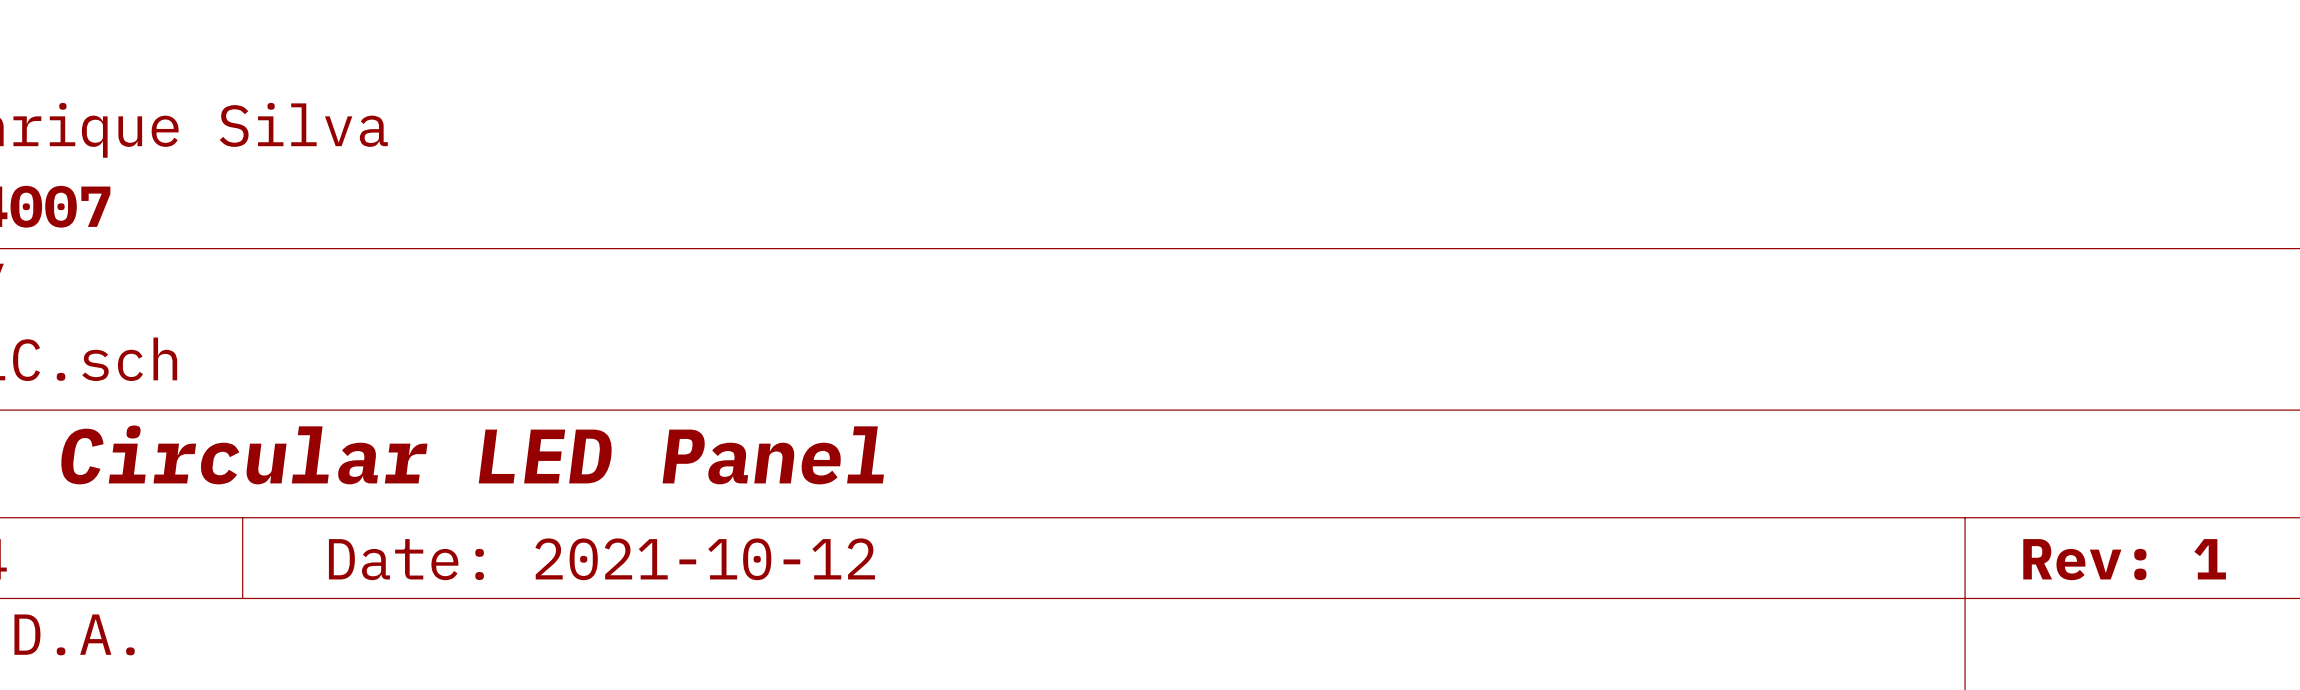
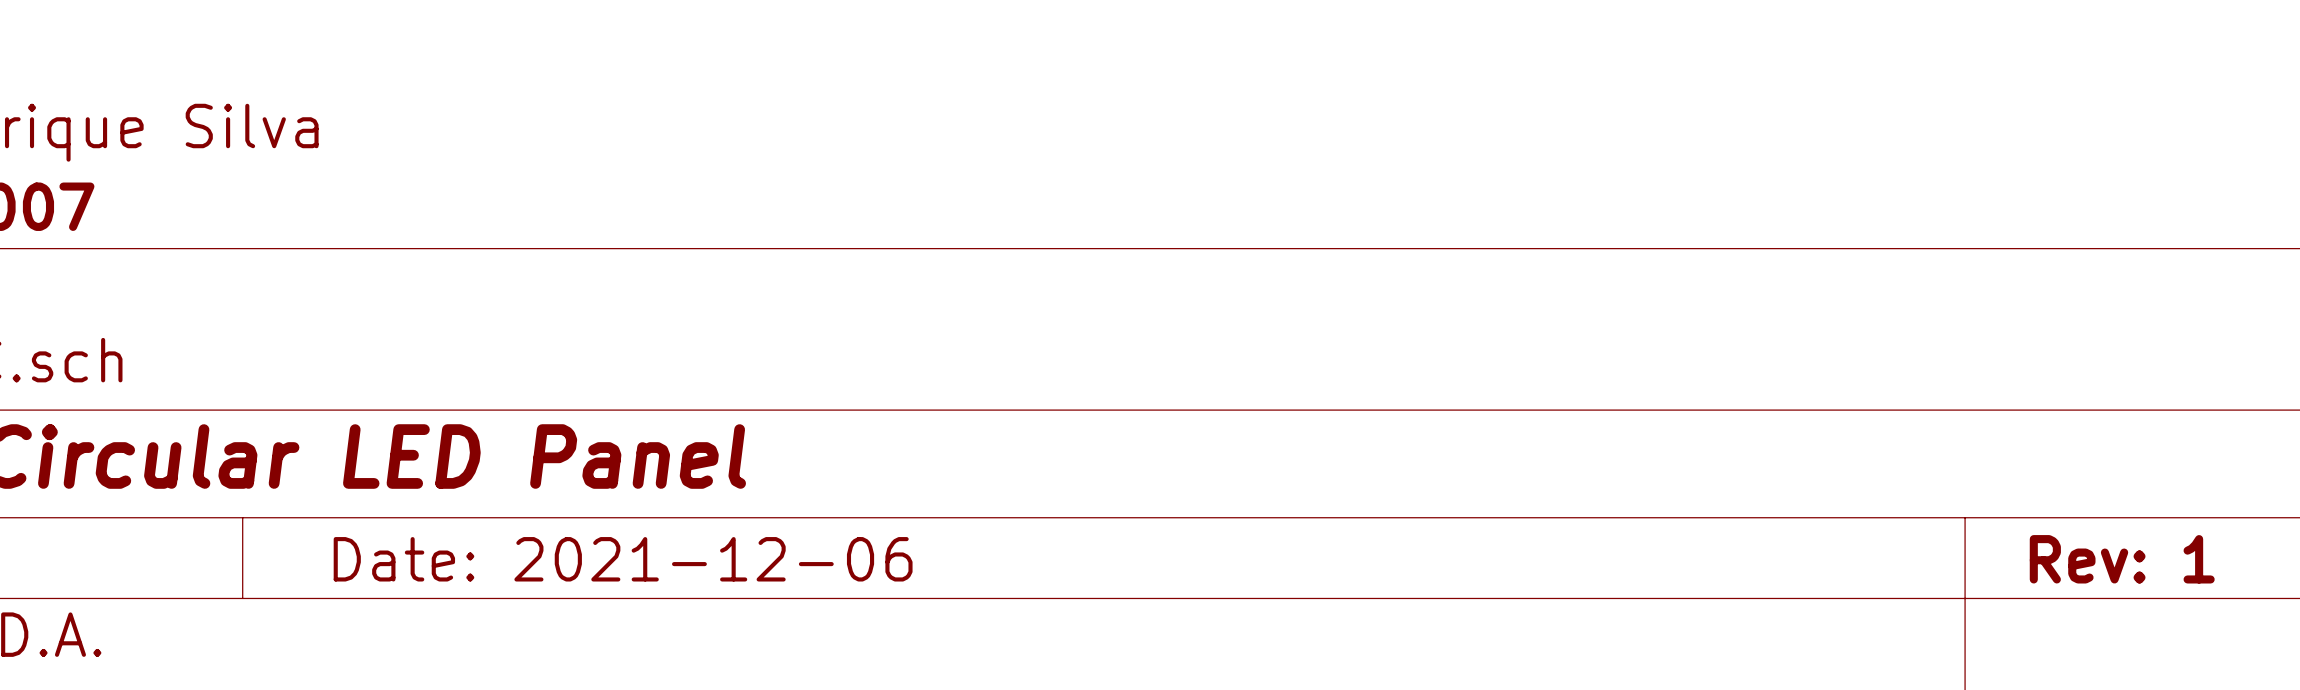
title block: Date: 2021-10-12 (601, 559) -> Date: 2021-12-06 (623, 559)

